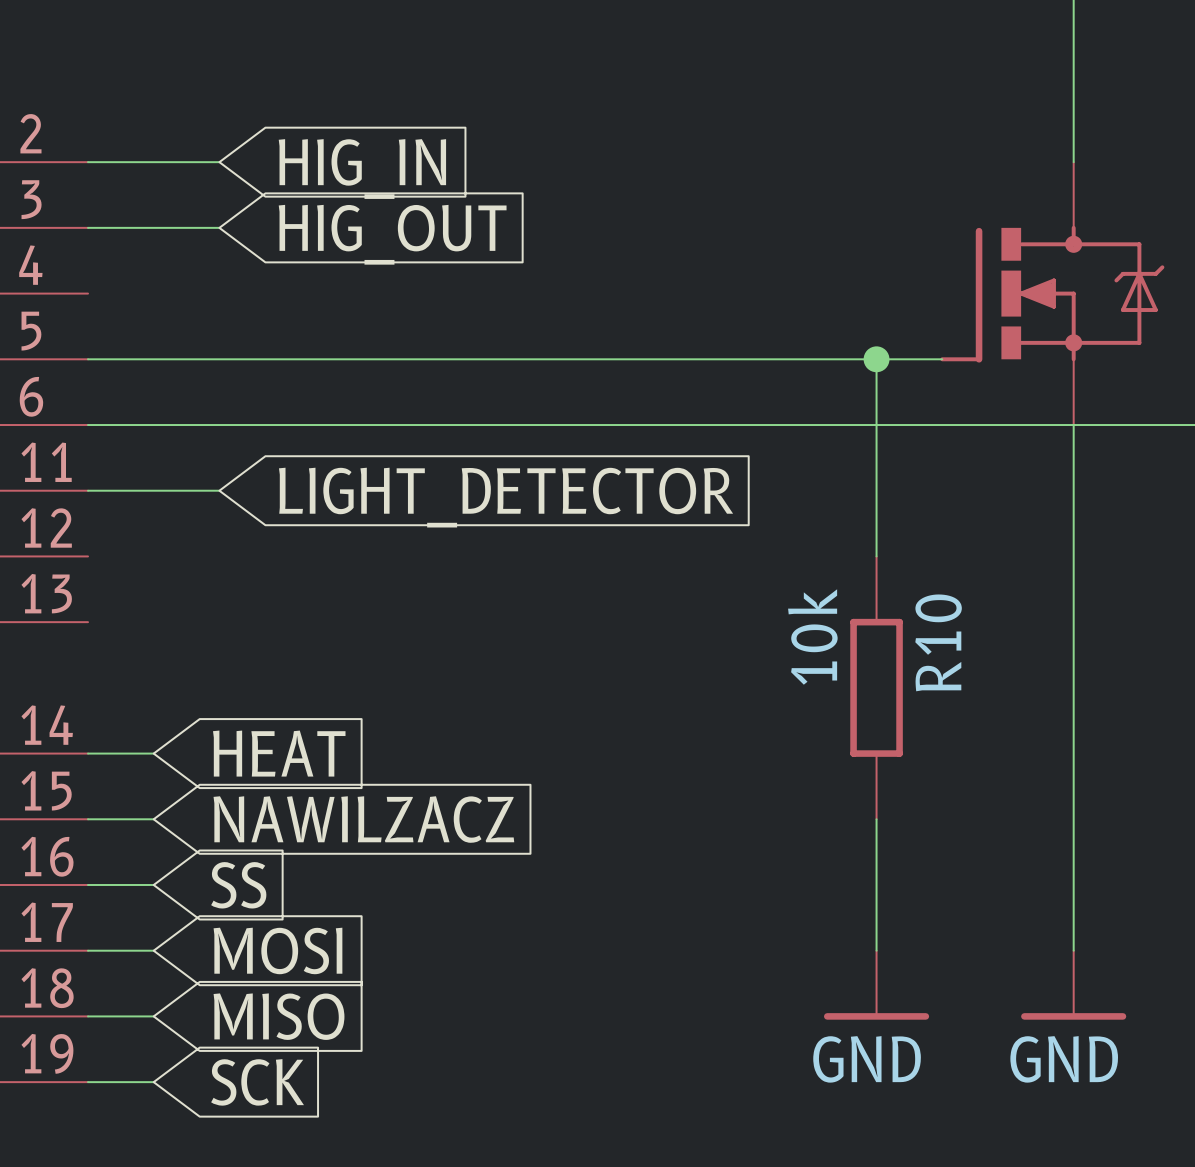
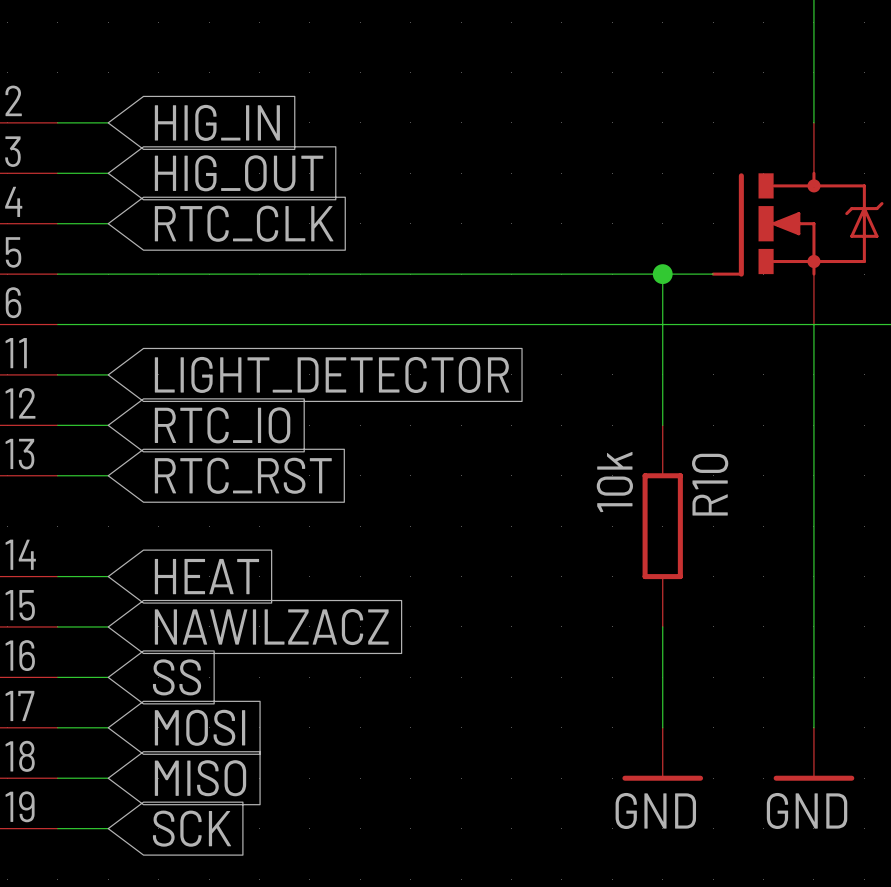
wire: (153, 162) (219, 162) -> (57, 475) (108, 475)
global label position: HIG_IN (362, 169) -> HIG_IN (217, 122)
wire: (153, 227) (219, 227) -> (57, 223) (108, 223)
global label position: HIG_OUT (392, 234) -> HIG_OUT (239, 173)
global label: none -> RTC_CLK (244, 223)
wire: (153, 490) (219, 490) -> (57, 425) (108, 425)
global label position: LIGHT_DETECTOR (506, 497) -> LIGHT_DETECTOR (332, 374)
global label: none -> RTC_IO (222, 425)
global label: none -> RTC_RST (243, 475)

